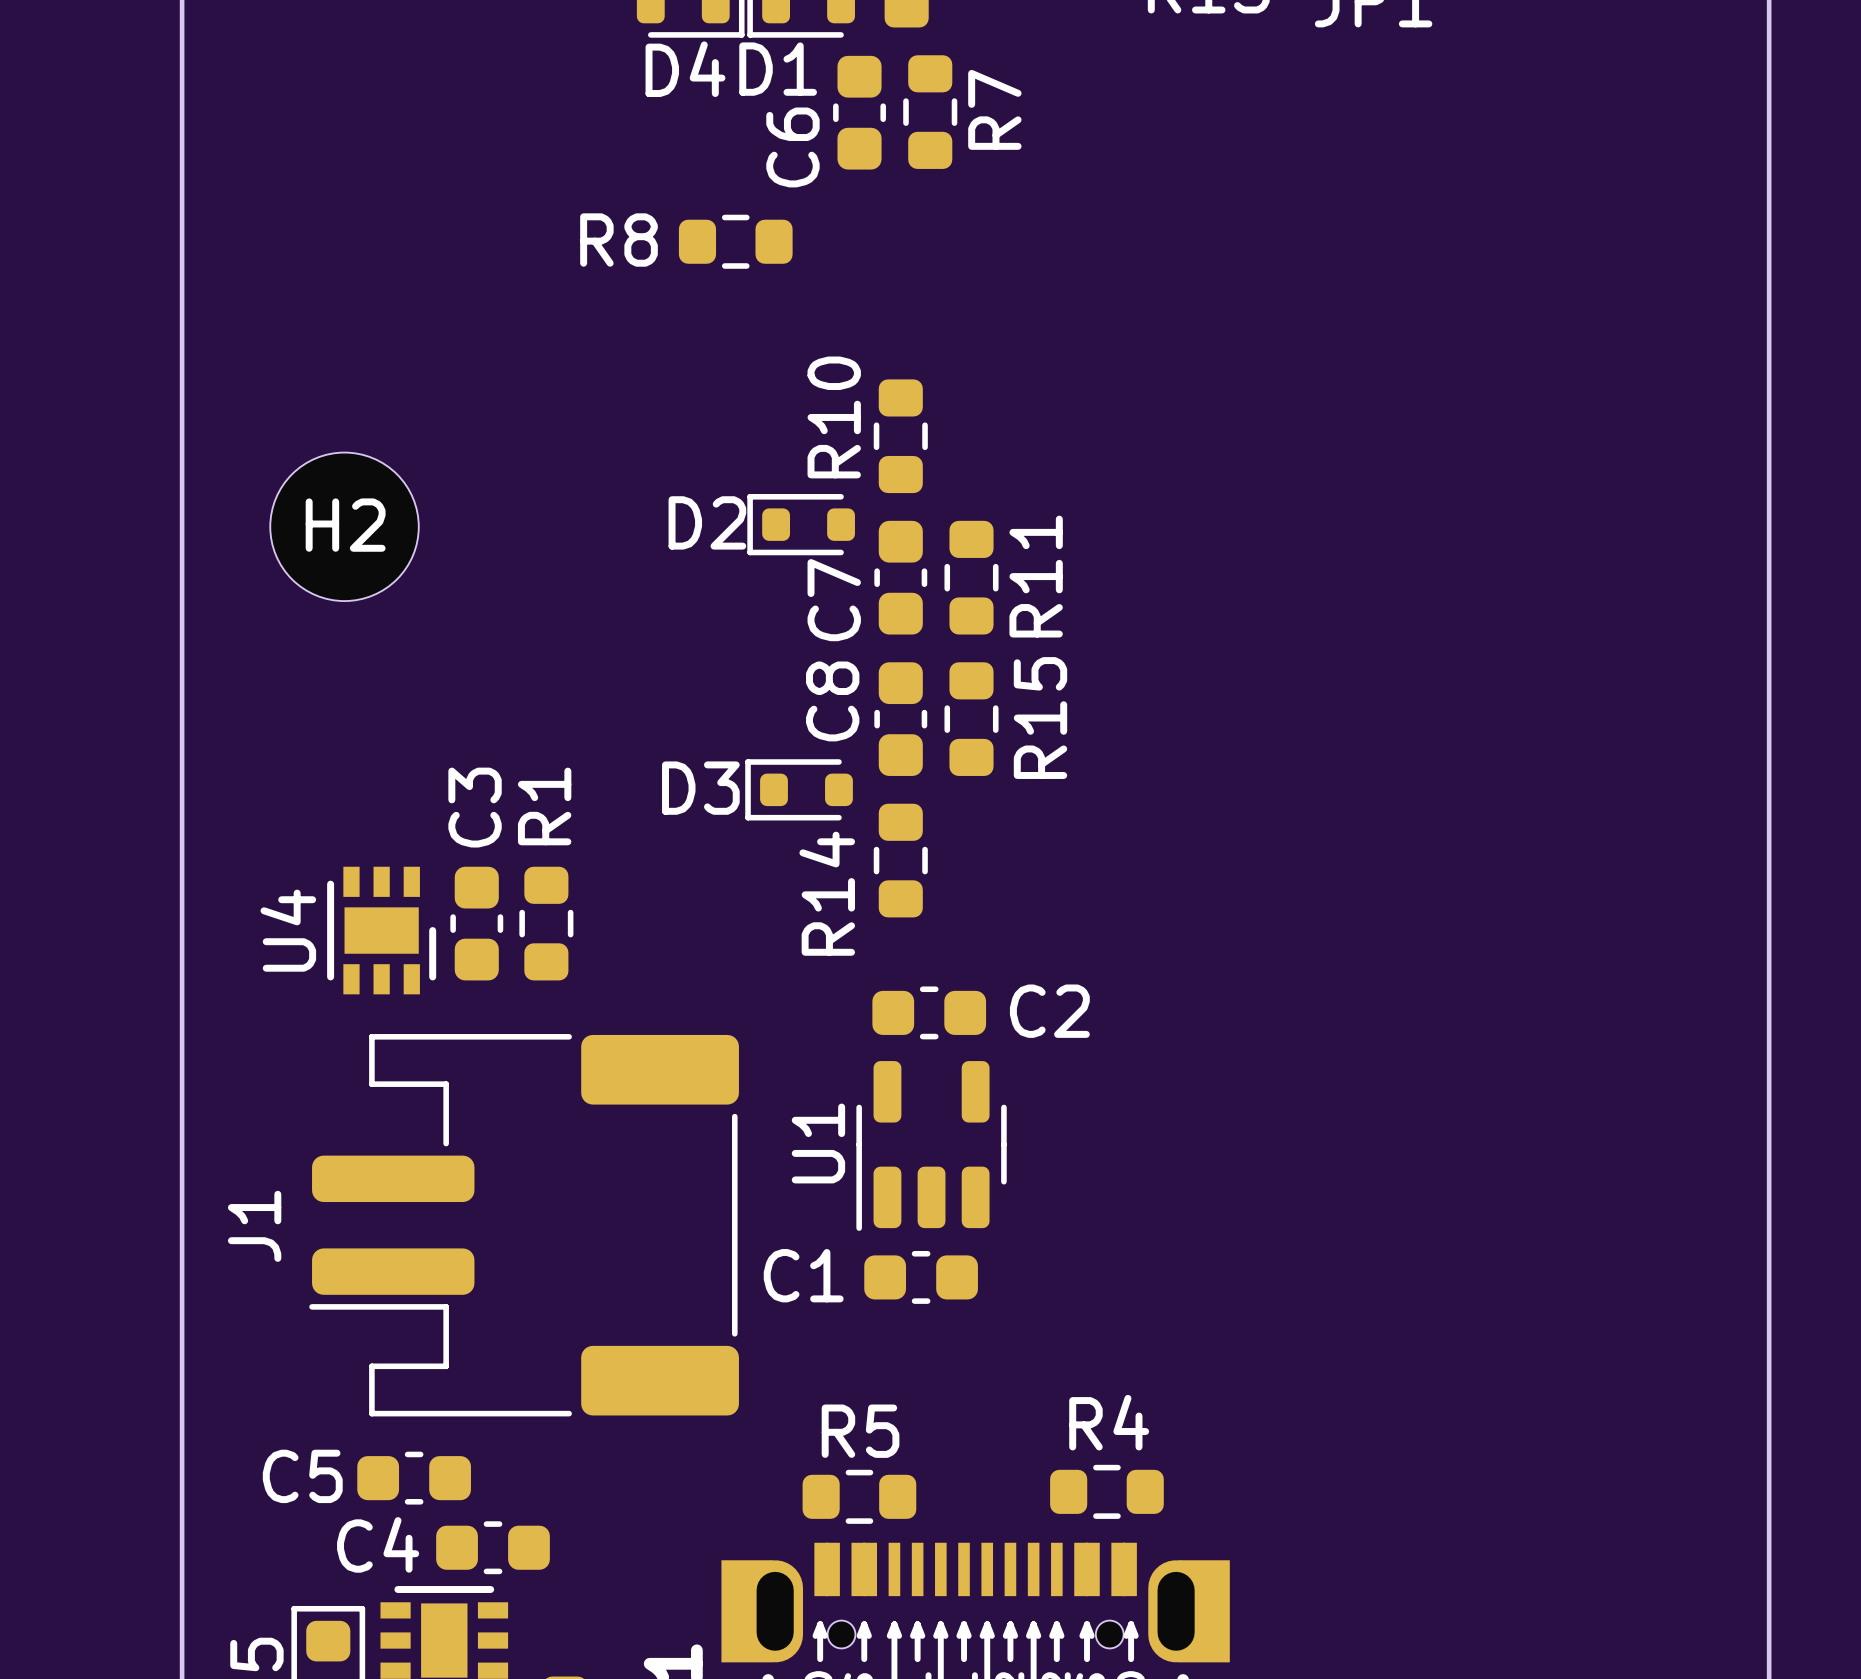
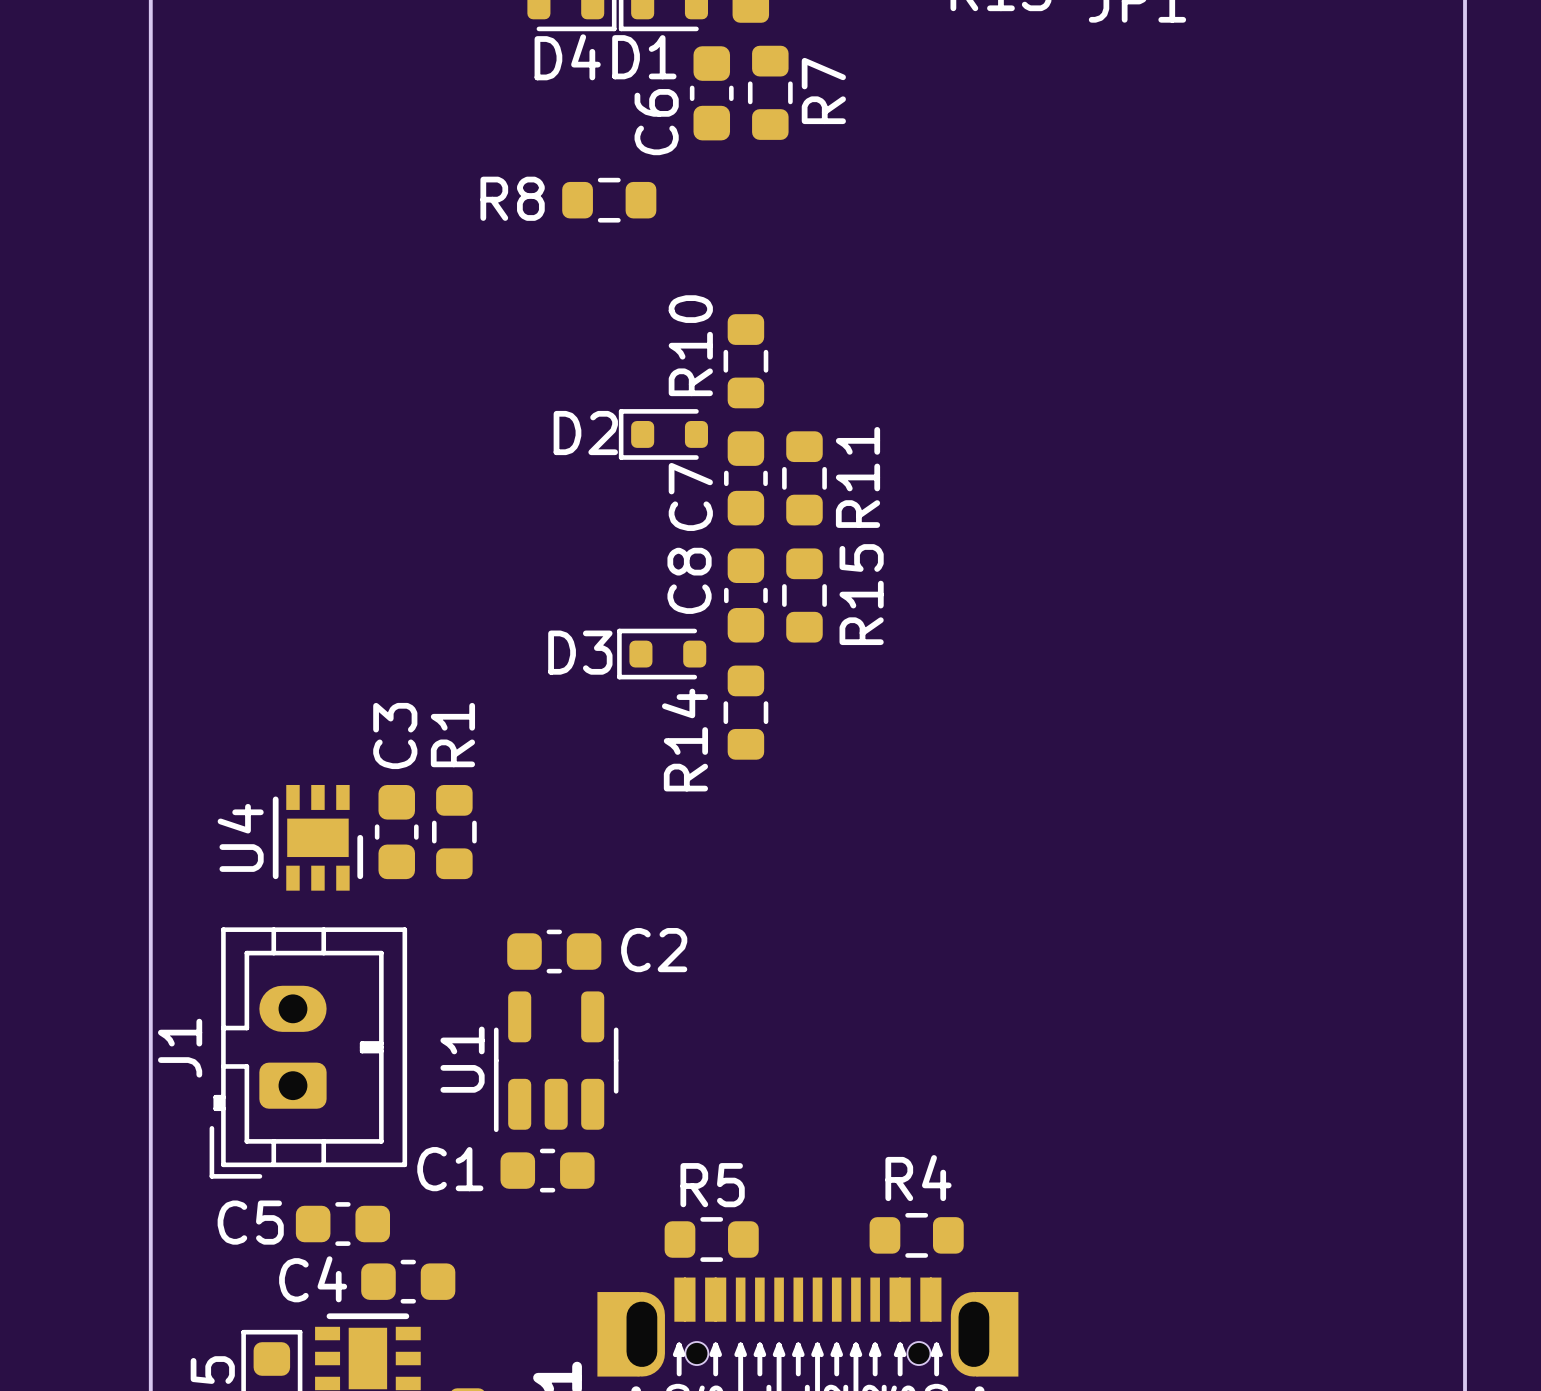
H2: (344, 526) -> none
C3 position: (476, 923) -> (396, 832)
R1 position: (546, 923) -> (454, 832)
U4 position: (381, 930) -> (317, 837)
C2 position: (929, 1012) -> (554, 951)
J1 footprint: [309, 1034, 739, 1417] -> [209, 927, 408, 1179]
U1 position: (931, 1145) -> (556, 1061)
J1 name position: J1 (254, 1226) -> J1 (180, 1048)
C1 position: (921, 1277) -> (547, 1170)

